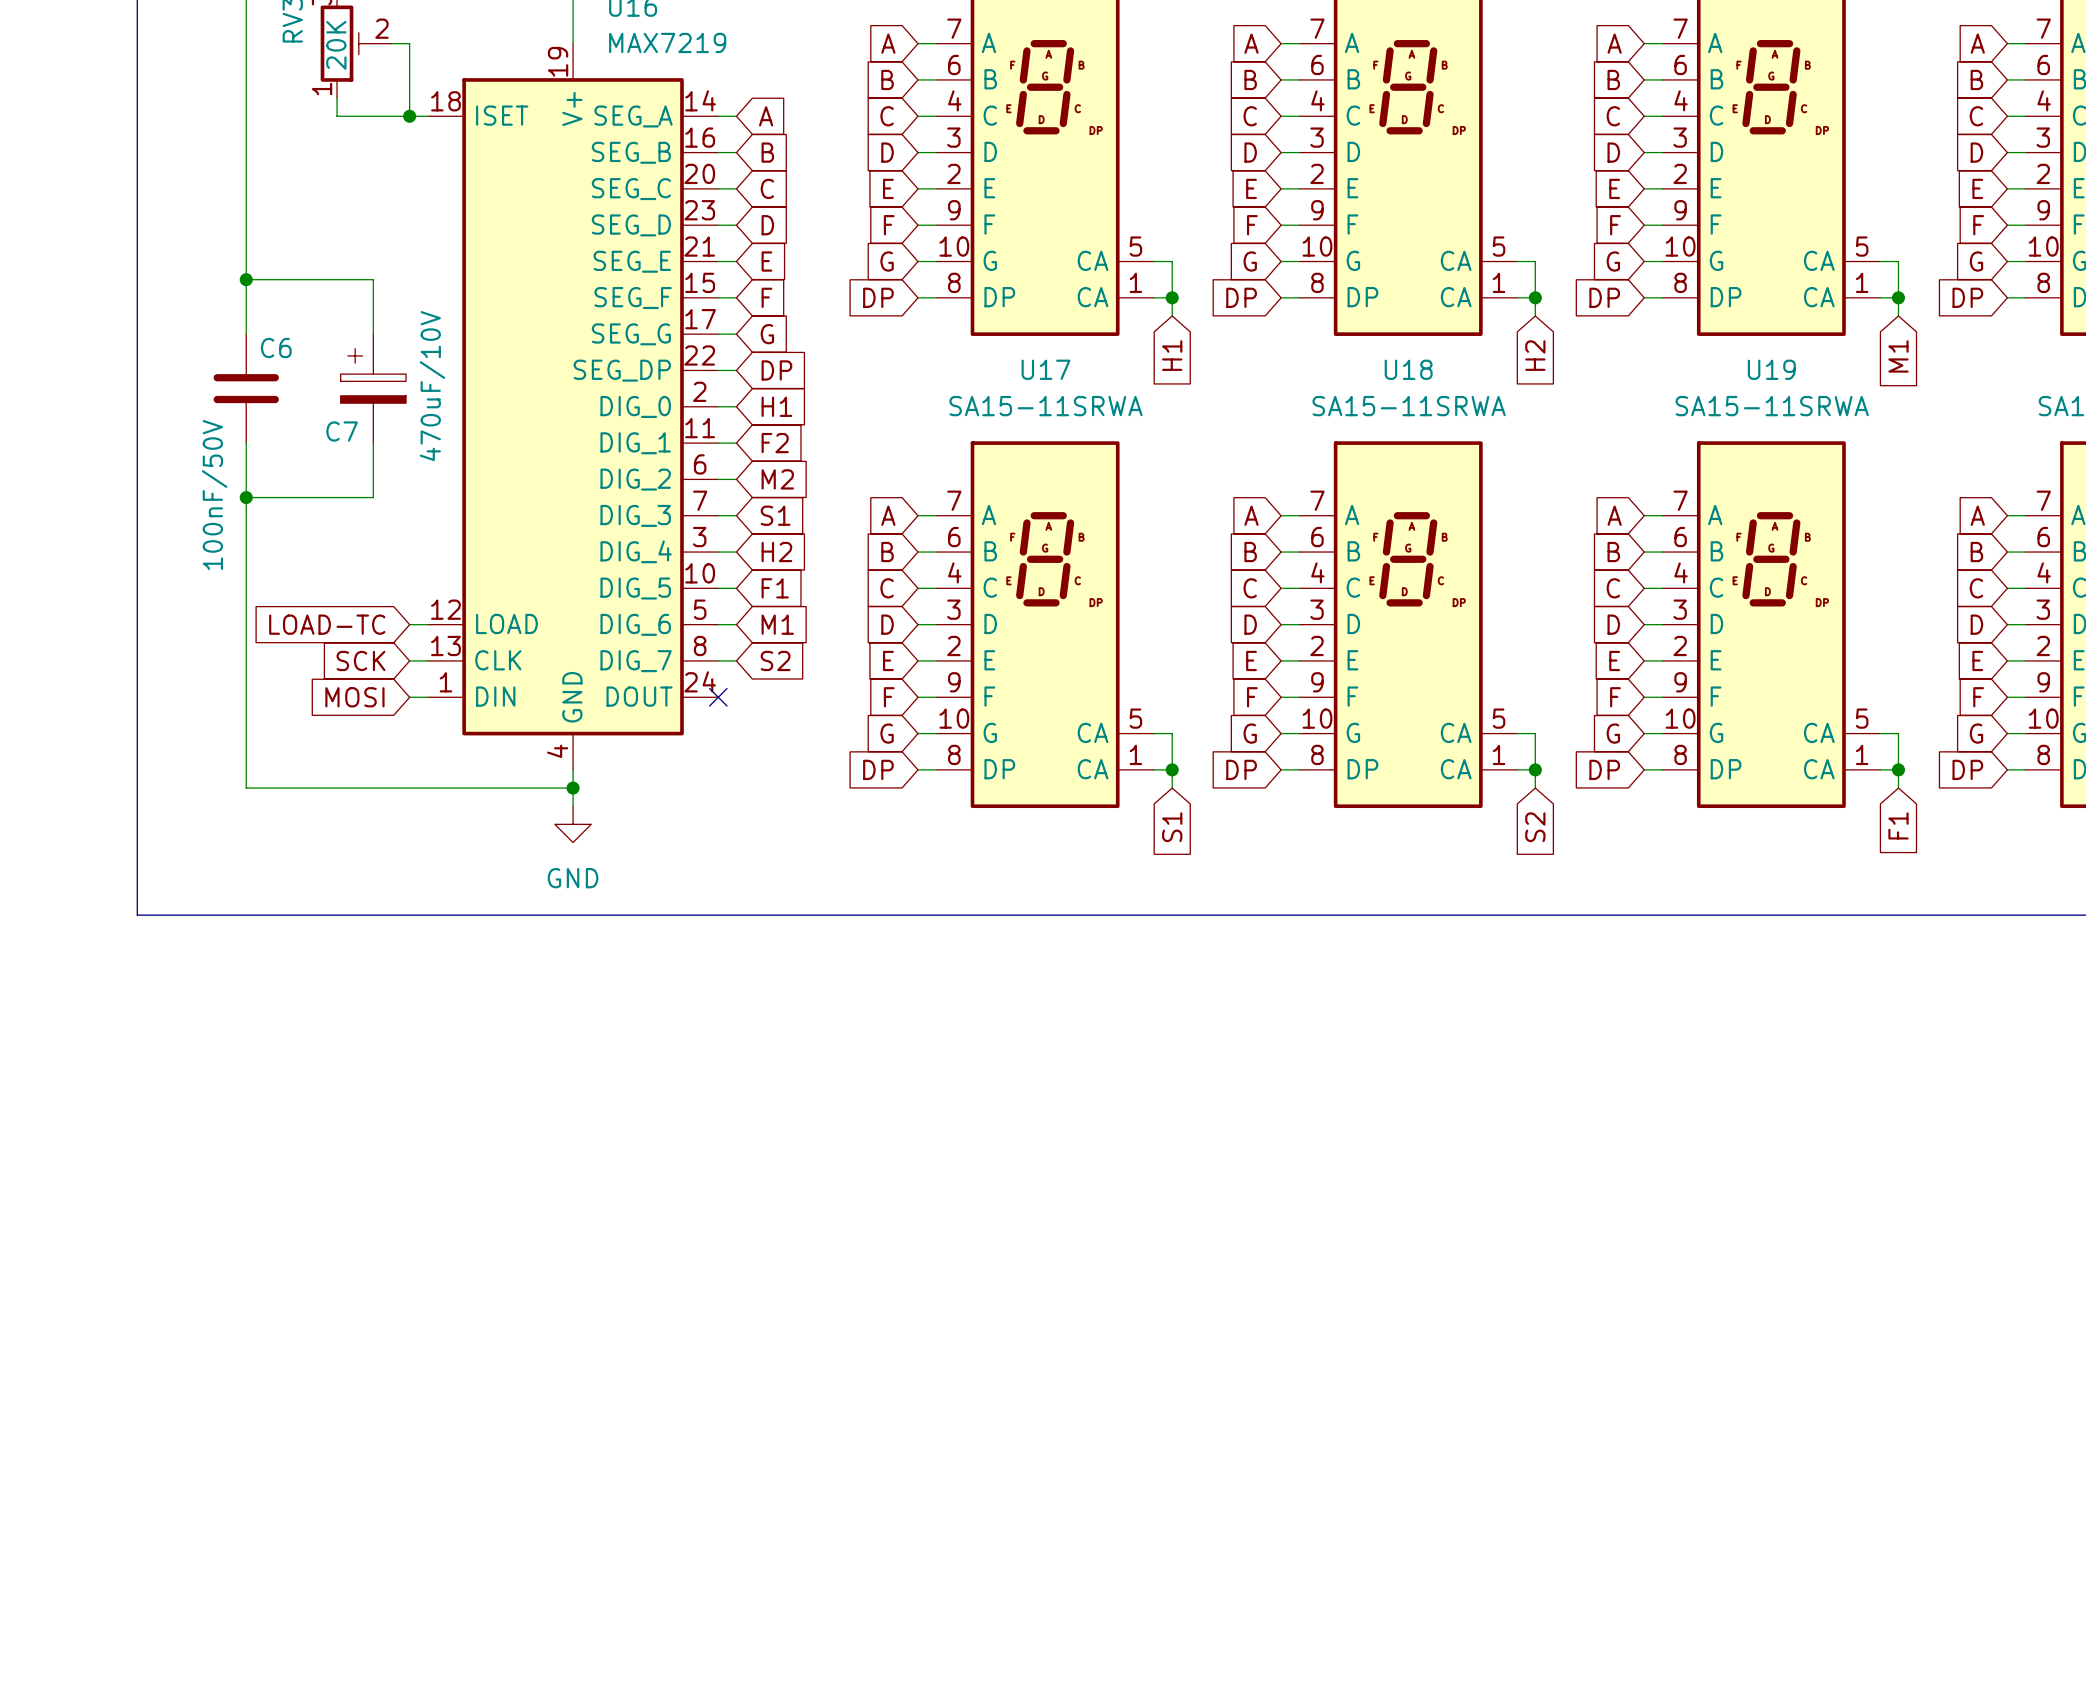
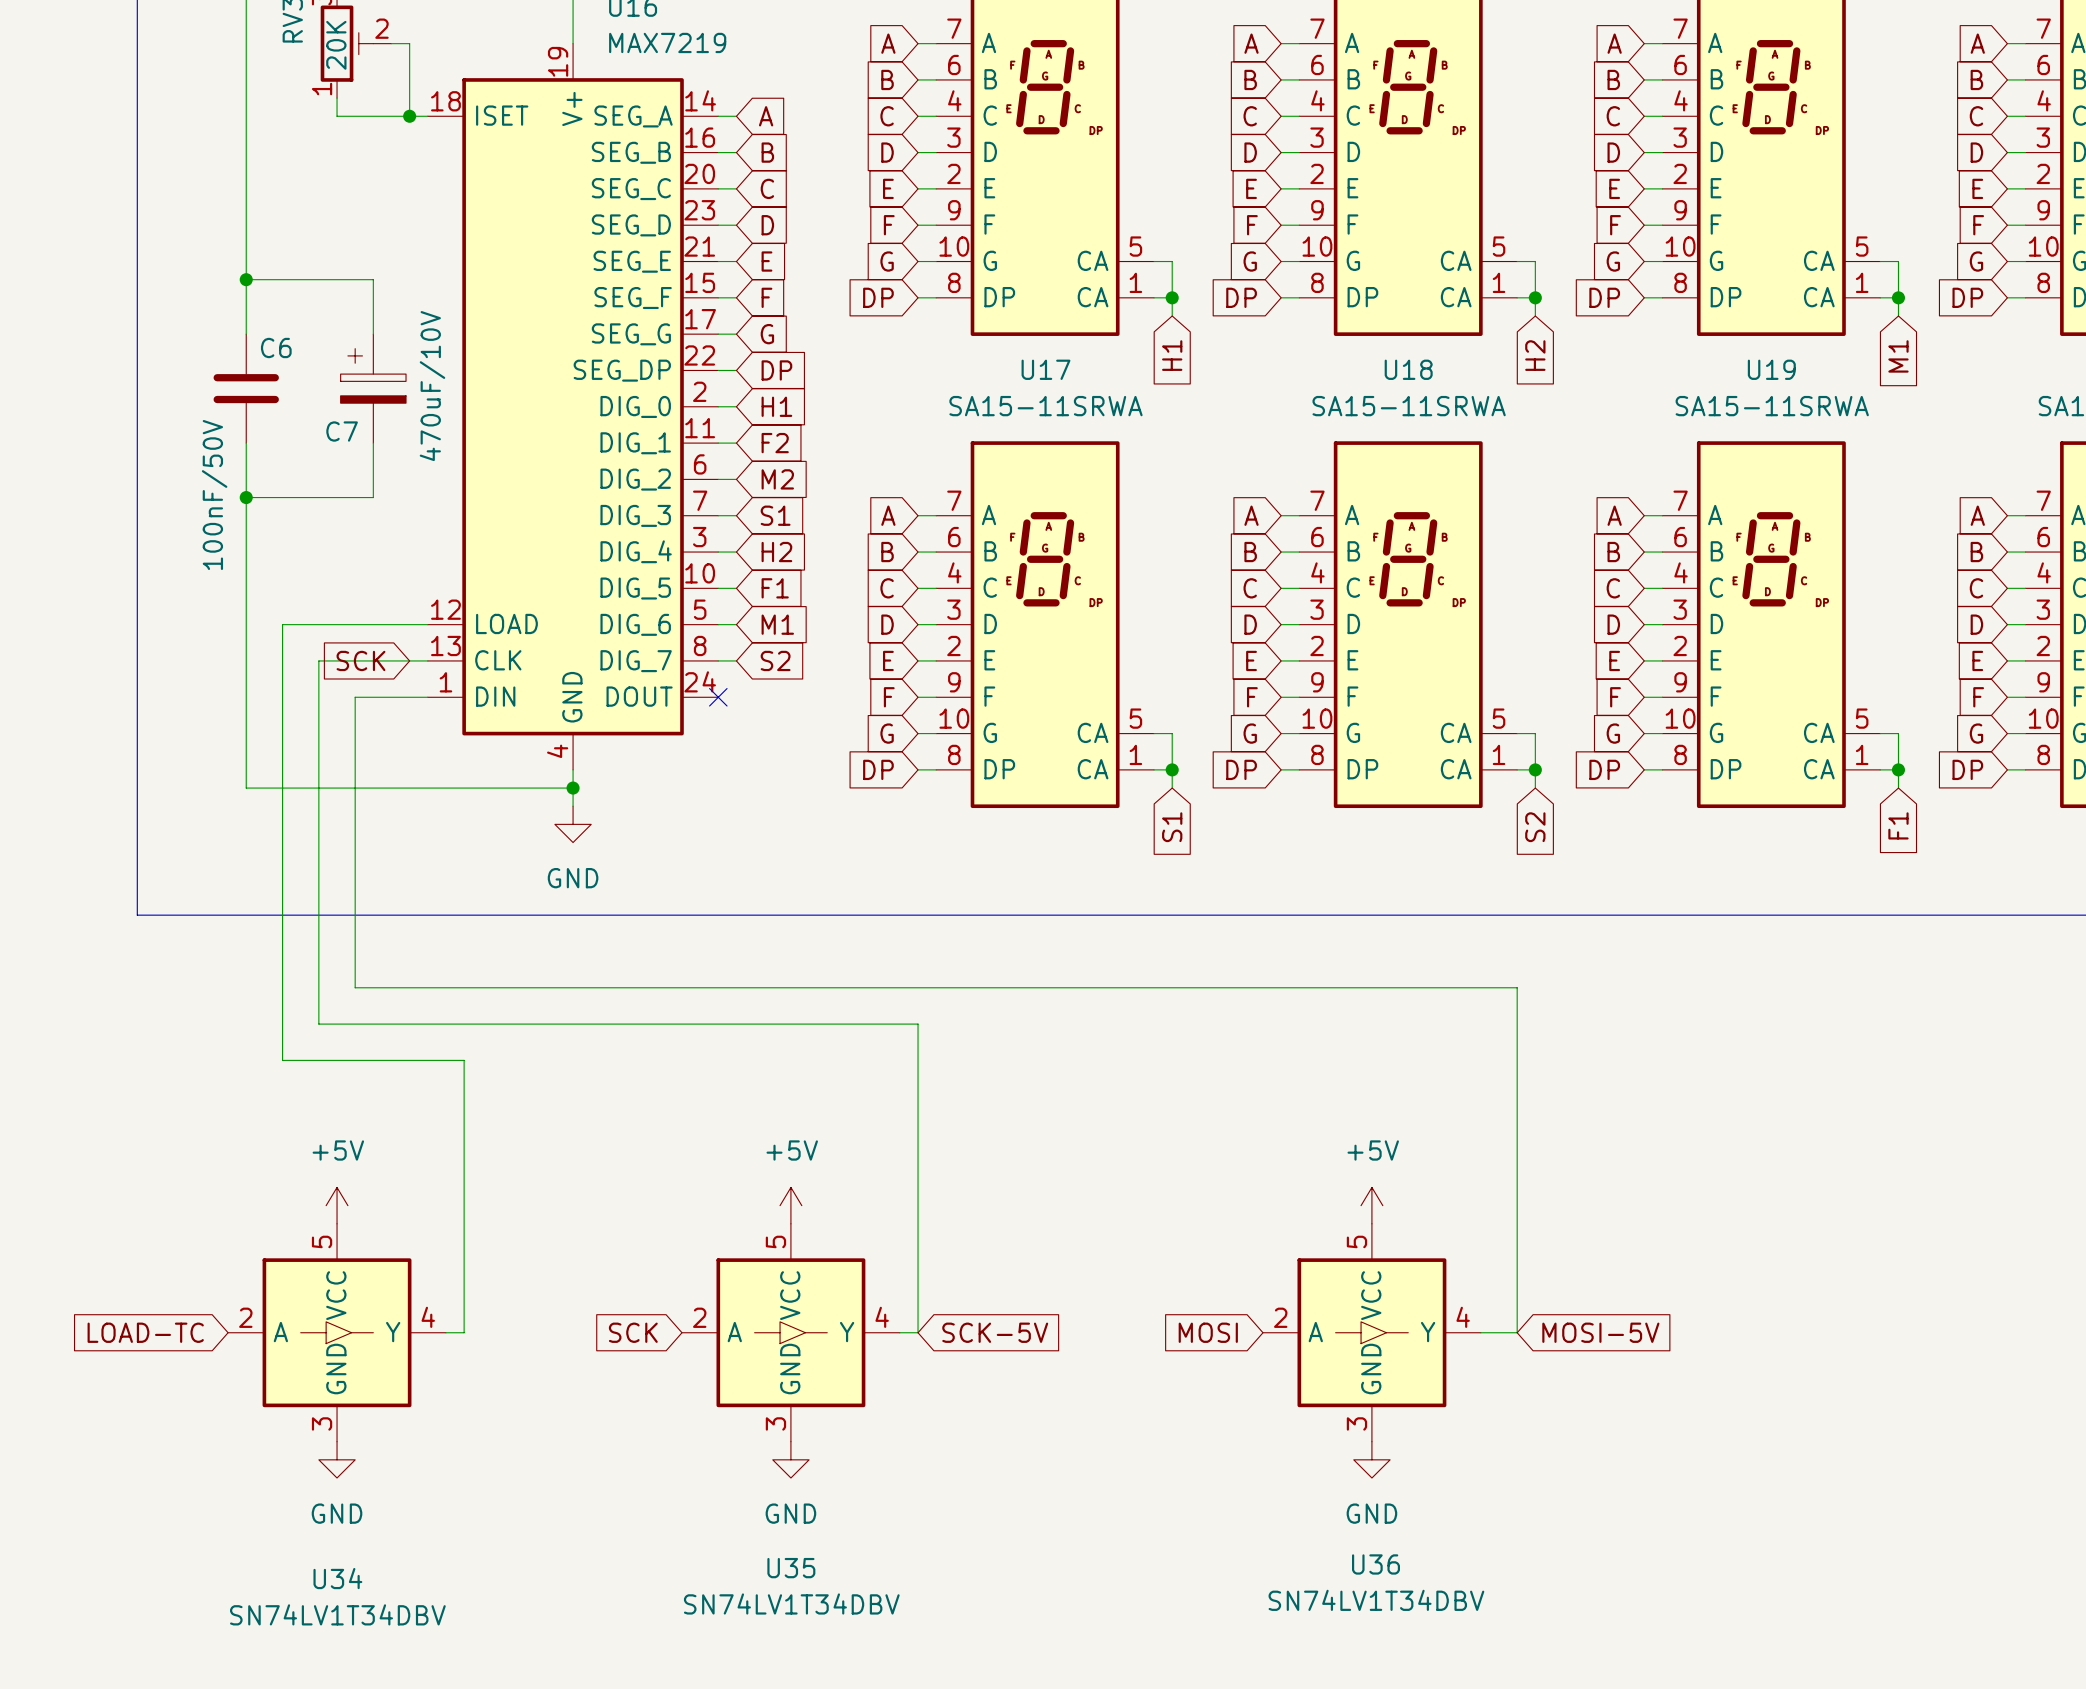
global label: LOAD-TC (327, 624) -> none
wire: none -> (409, 624) (282, 624) (282, 1060) (464, 1060) (464, 1332) (445, 1332)
wire: none -> (409, 660) (318, 660) (318, 1024) (918, 1024) (918, 1332) (899, 1332)
global label: MOSI (354, 697) -> none
wire: none -> (409, 697) (355, 697) (355, 987) (1517, 987) (1517, 1332) (1480, 1332)
power symbol: none -> +5V (337, 1205)
power symbol: none -> +5V (790, 1205)
power symbol: none -> +5V (1371, 1205)
global label: none -> LOAD-TC (145, 1332)
U34: none -> SN74LV1T34DBV (337, 1332)
global label: none -> SCK (633, 1332)
U35: none -> SN74LV1T34DBV (790, 1332)
global label: none -> SCK-5V (995, 1332)
global label: none -> MOSI (1208, 1332)
U36: none -> SN74LV1T34DBV (1371, 1332)
global label: none -> MOSI-5V (1600, 1332)
power symbol: none -> GND (337, 1459)
power symbol: none -> GND (790, 1459)
power symbol: none -> GND (1371, 1459)

